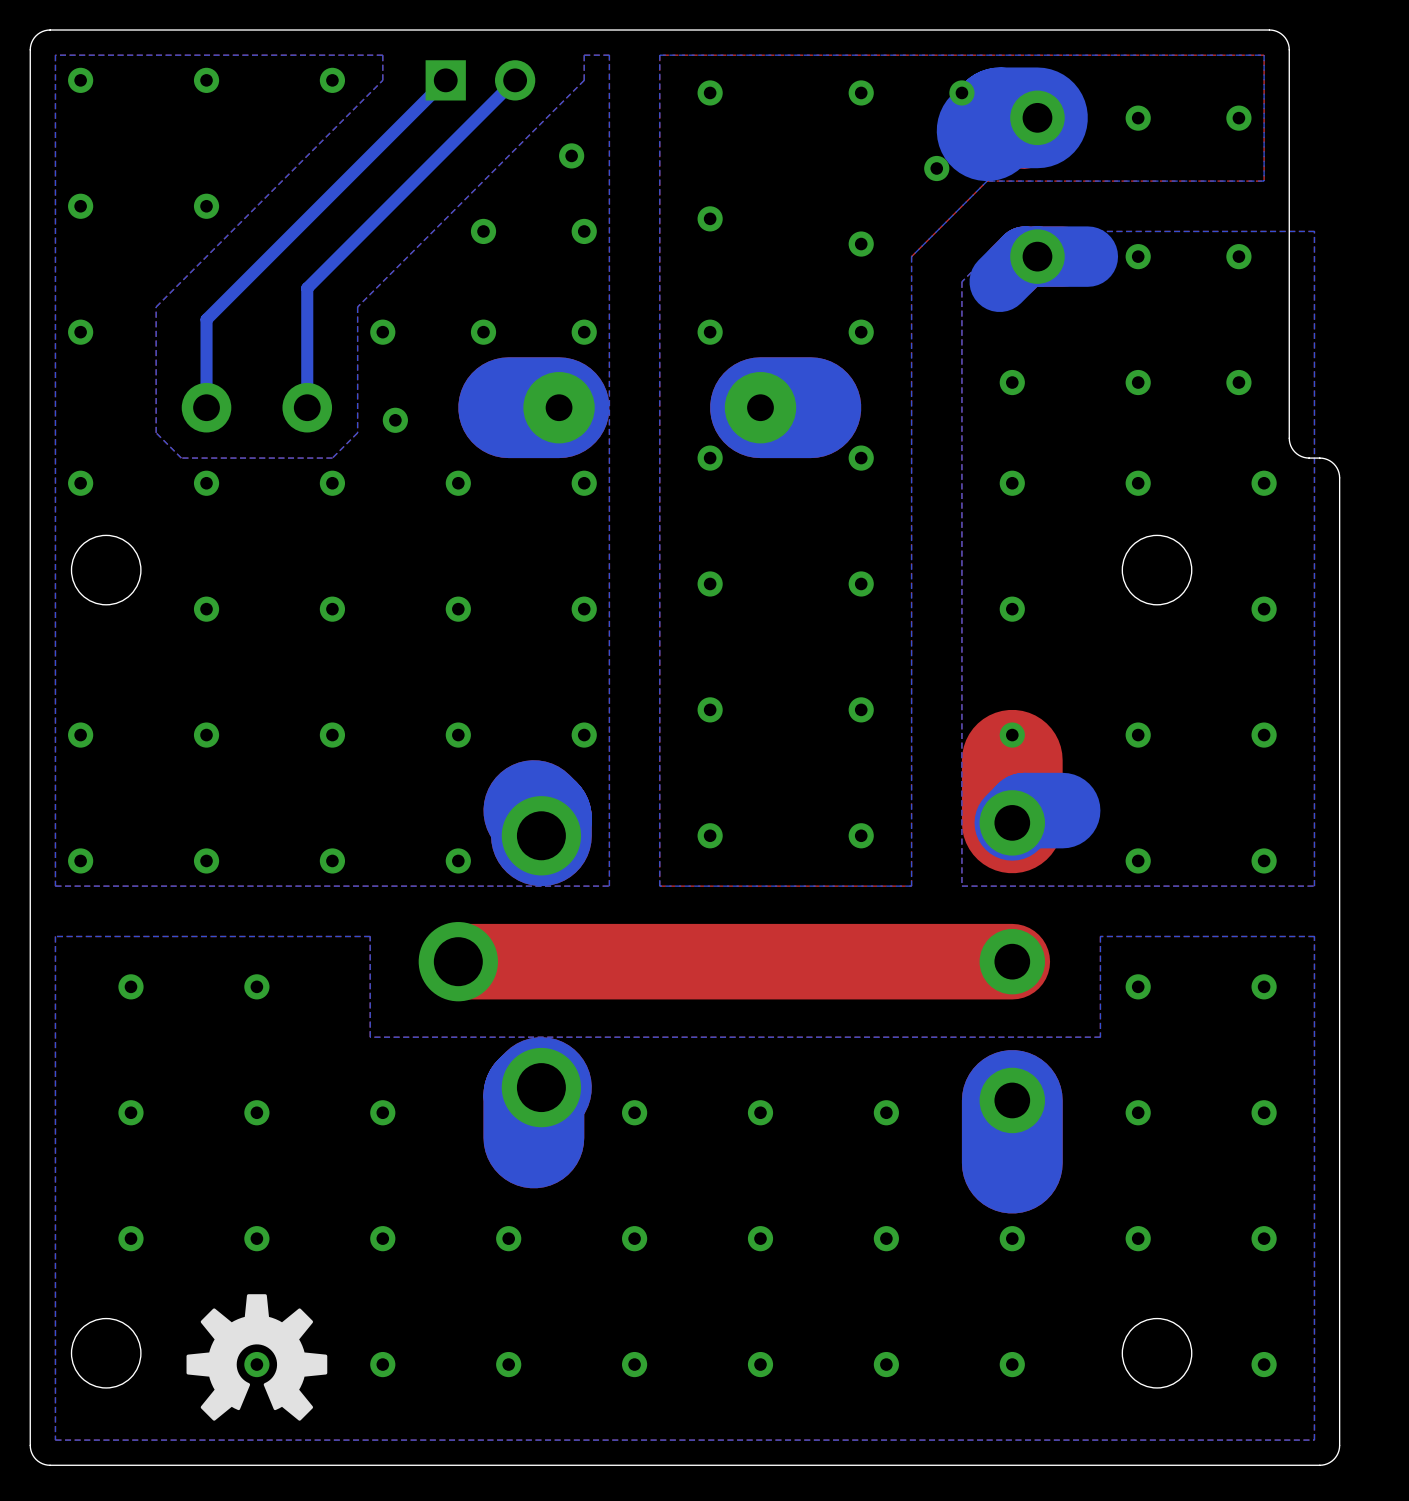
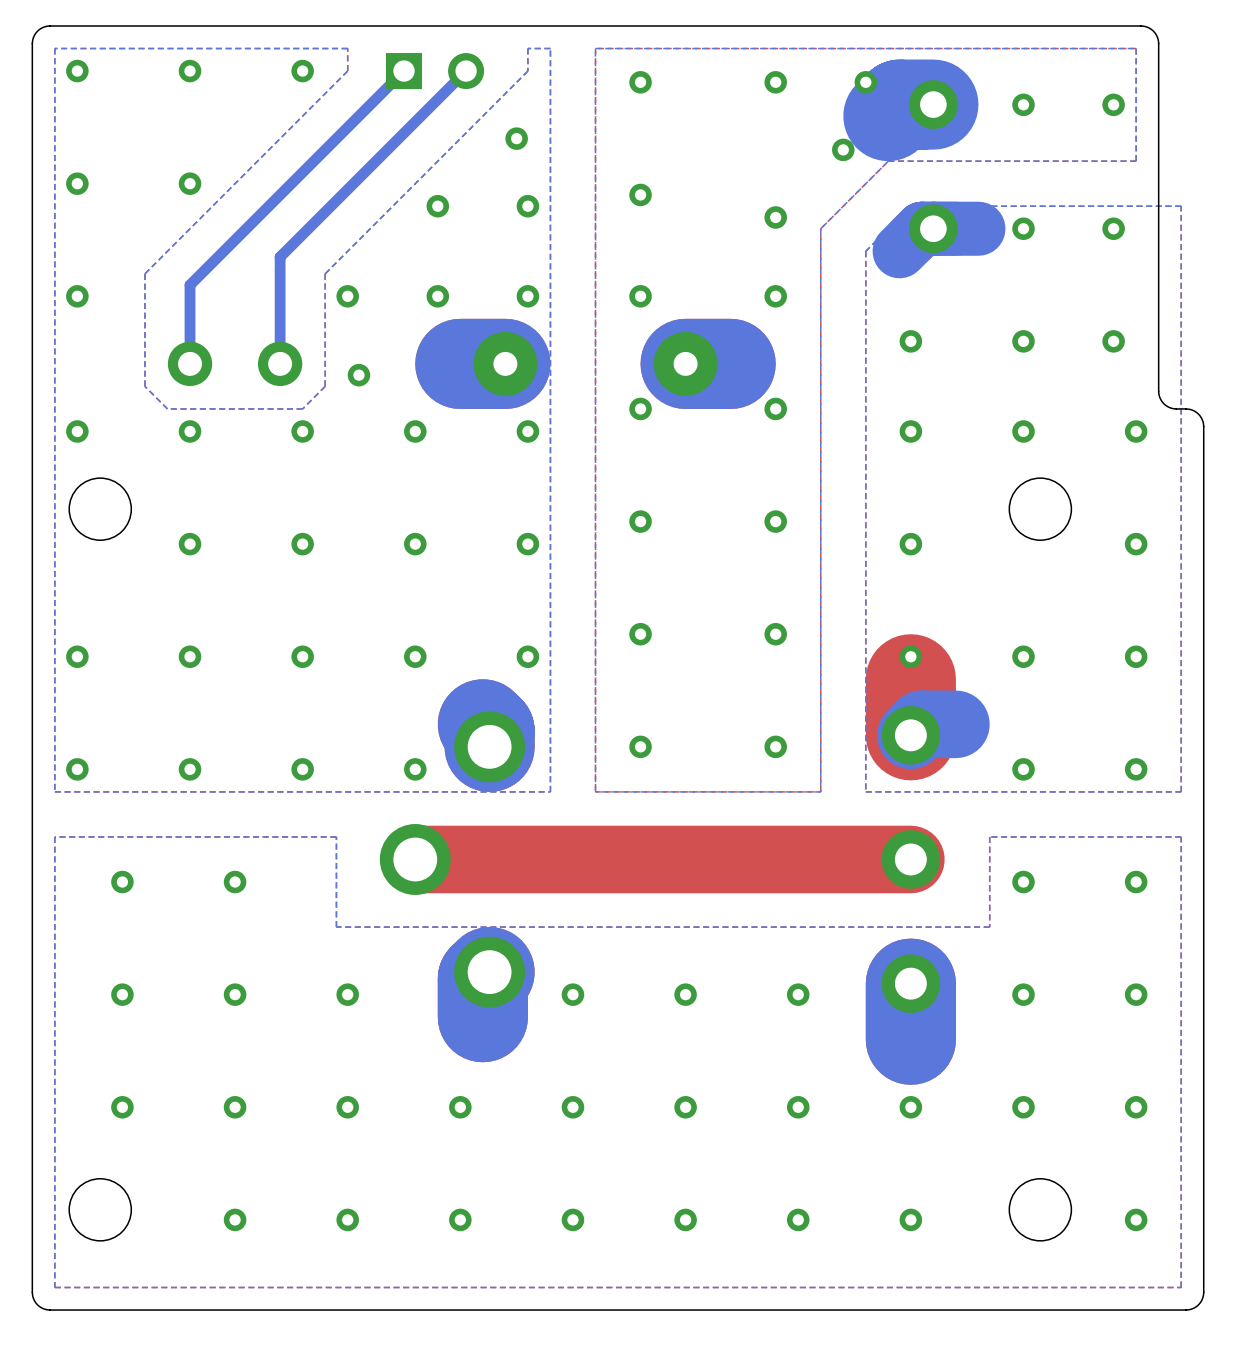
drawing: [186, 1294, 328, 1421] -> none

